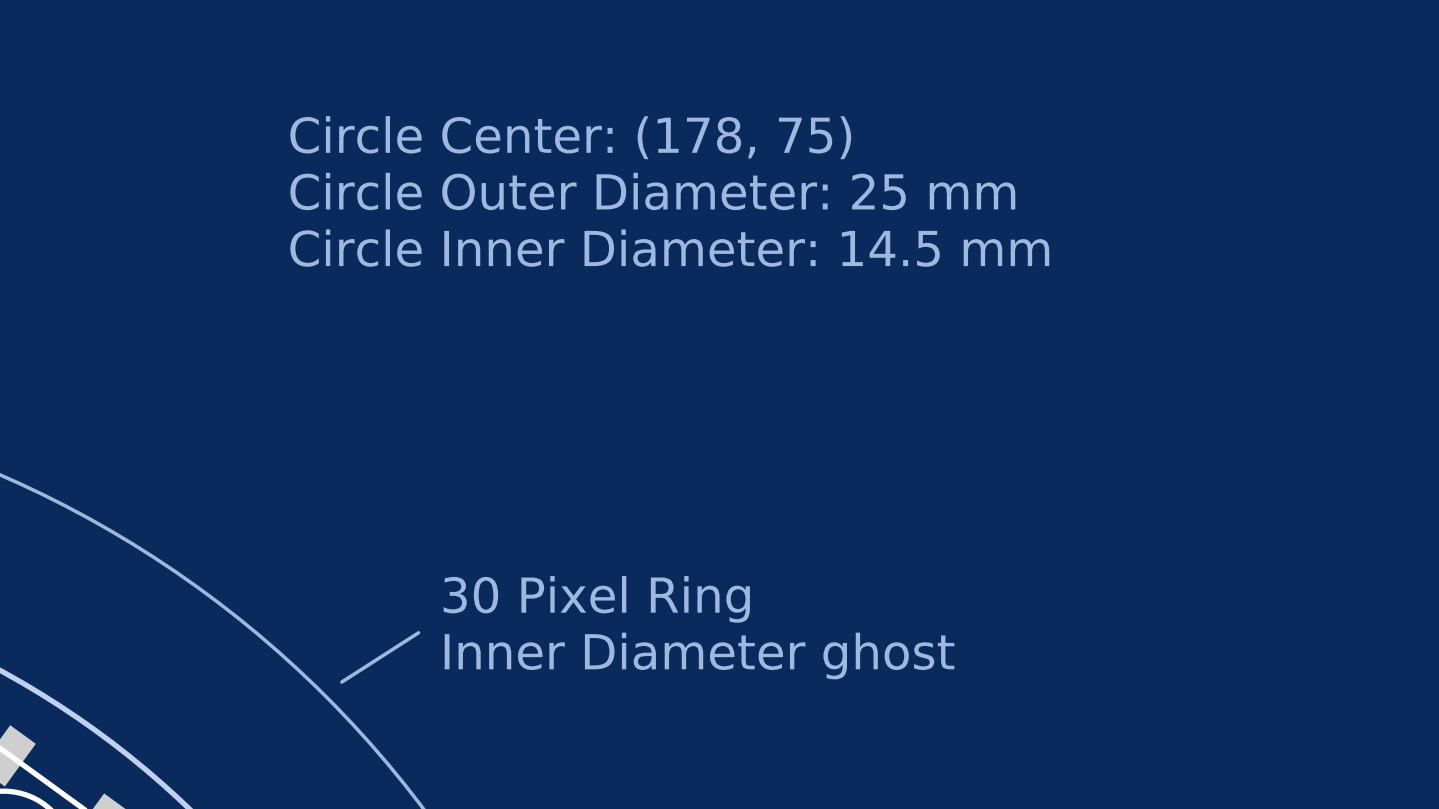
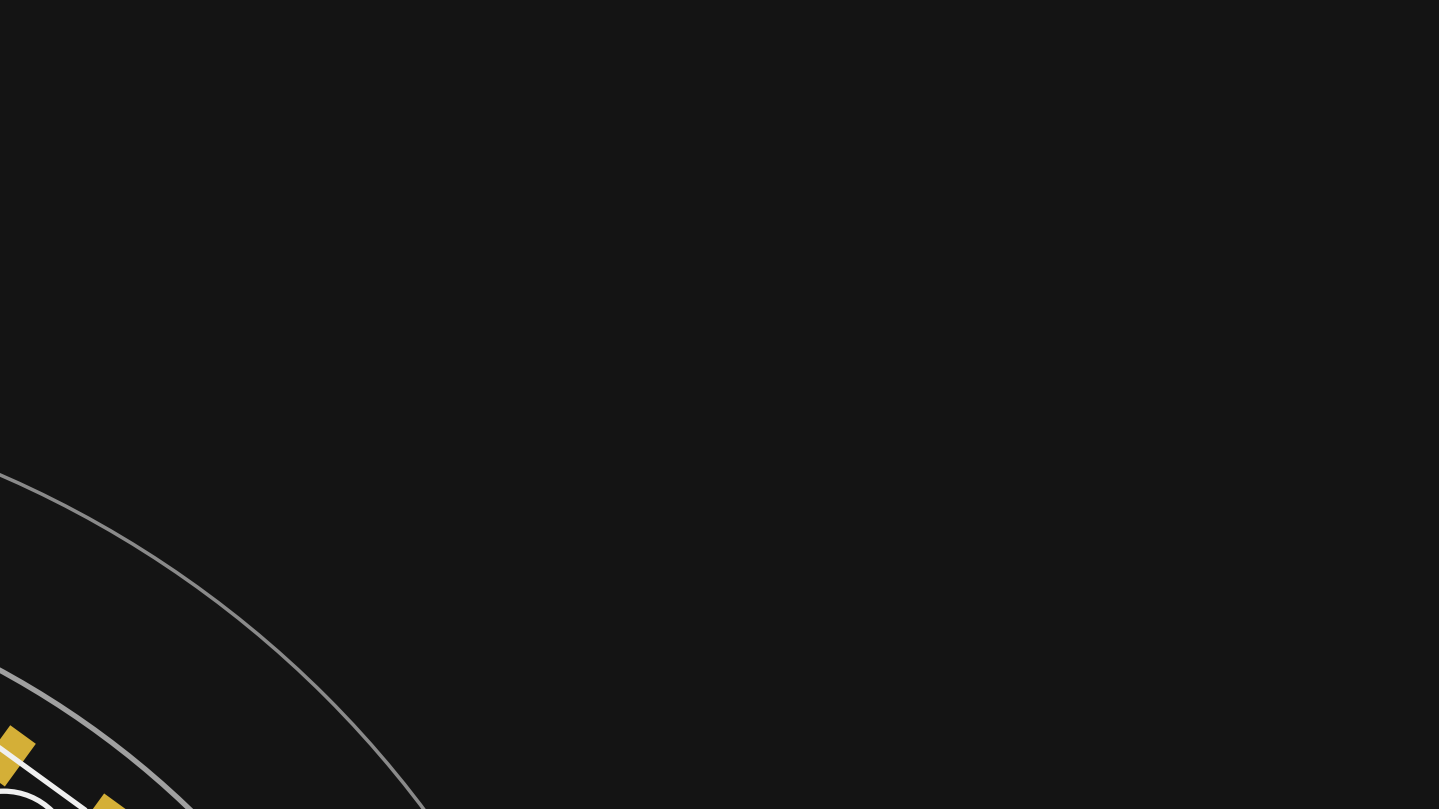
text: Circle Center: (178, 75) (570, 137) -> none
text: Circle Outer Diameter: 25 mm (652, 191) -> none
text: Circle Inner Diameter: 14.5 mm (669, 248) -> none
text: 30 Pixel Ring (596, 599) -> none
line: (418, 632) (341, 682) -> none
text: Inner Diameter ghost (699, 656) -> none

